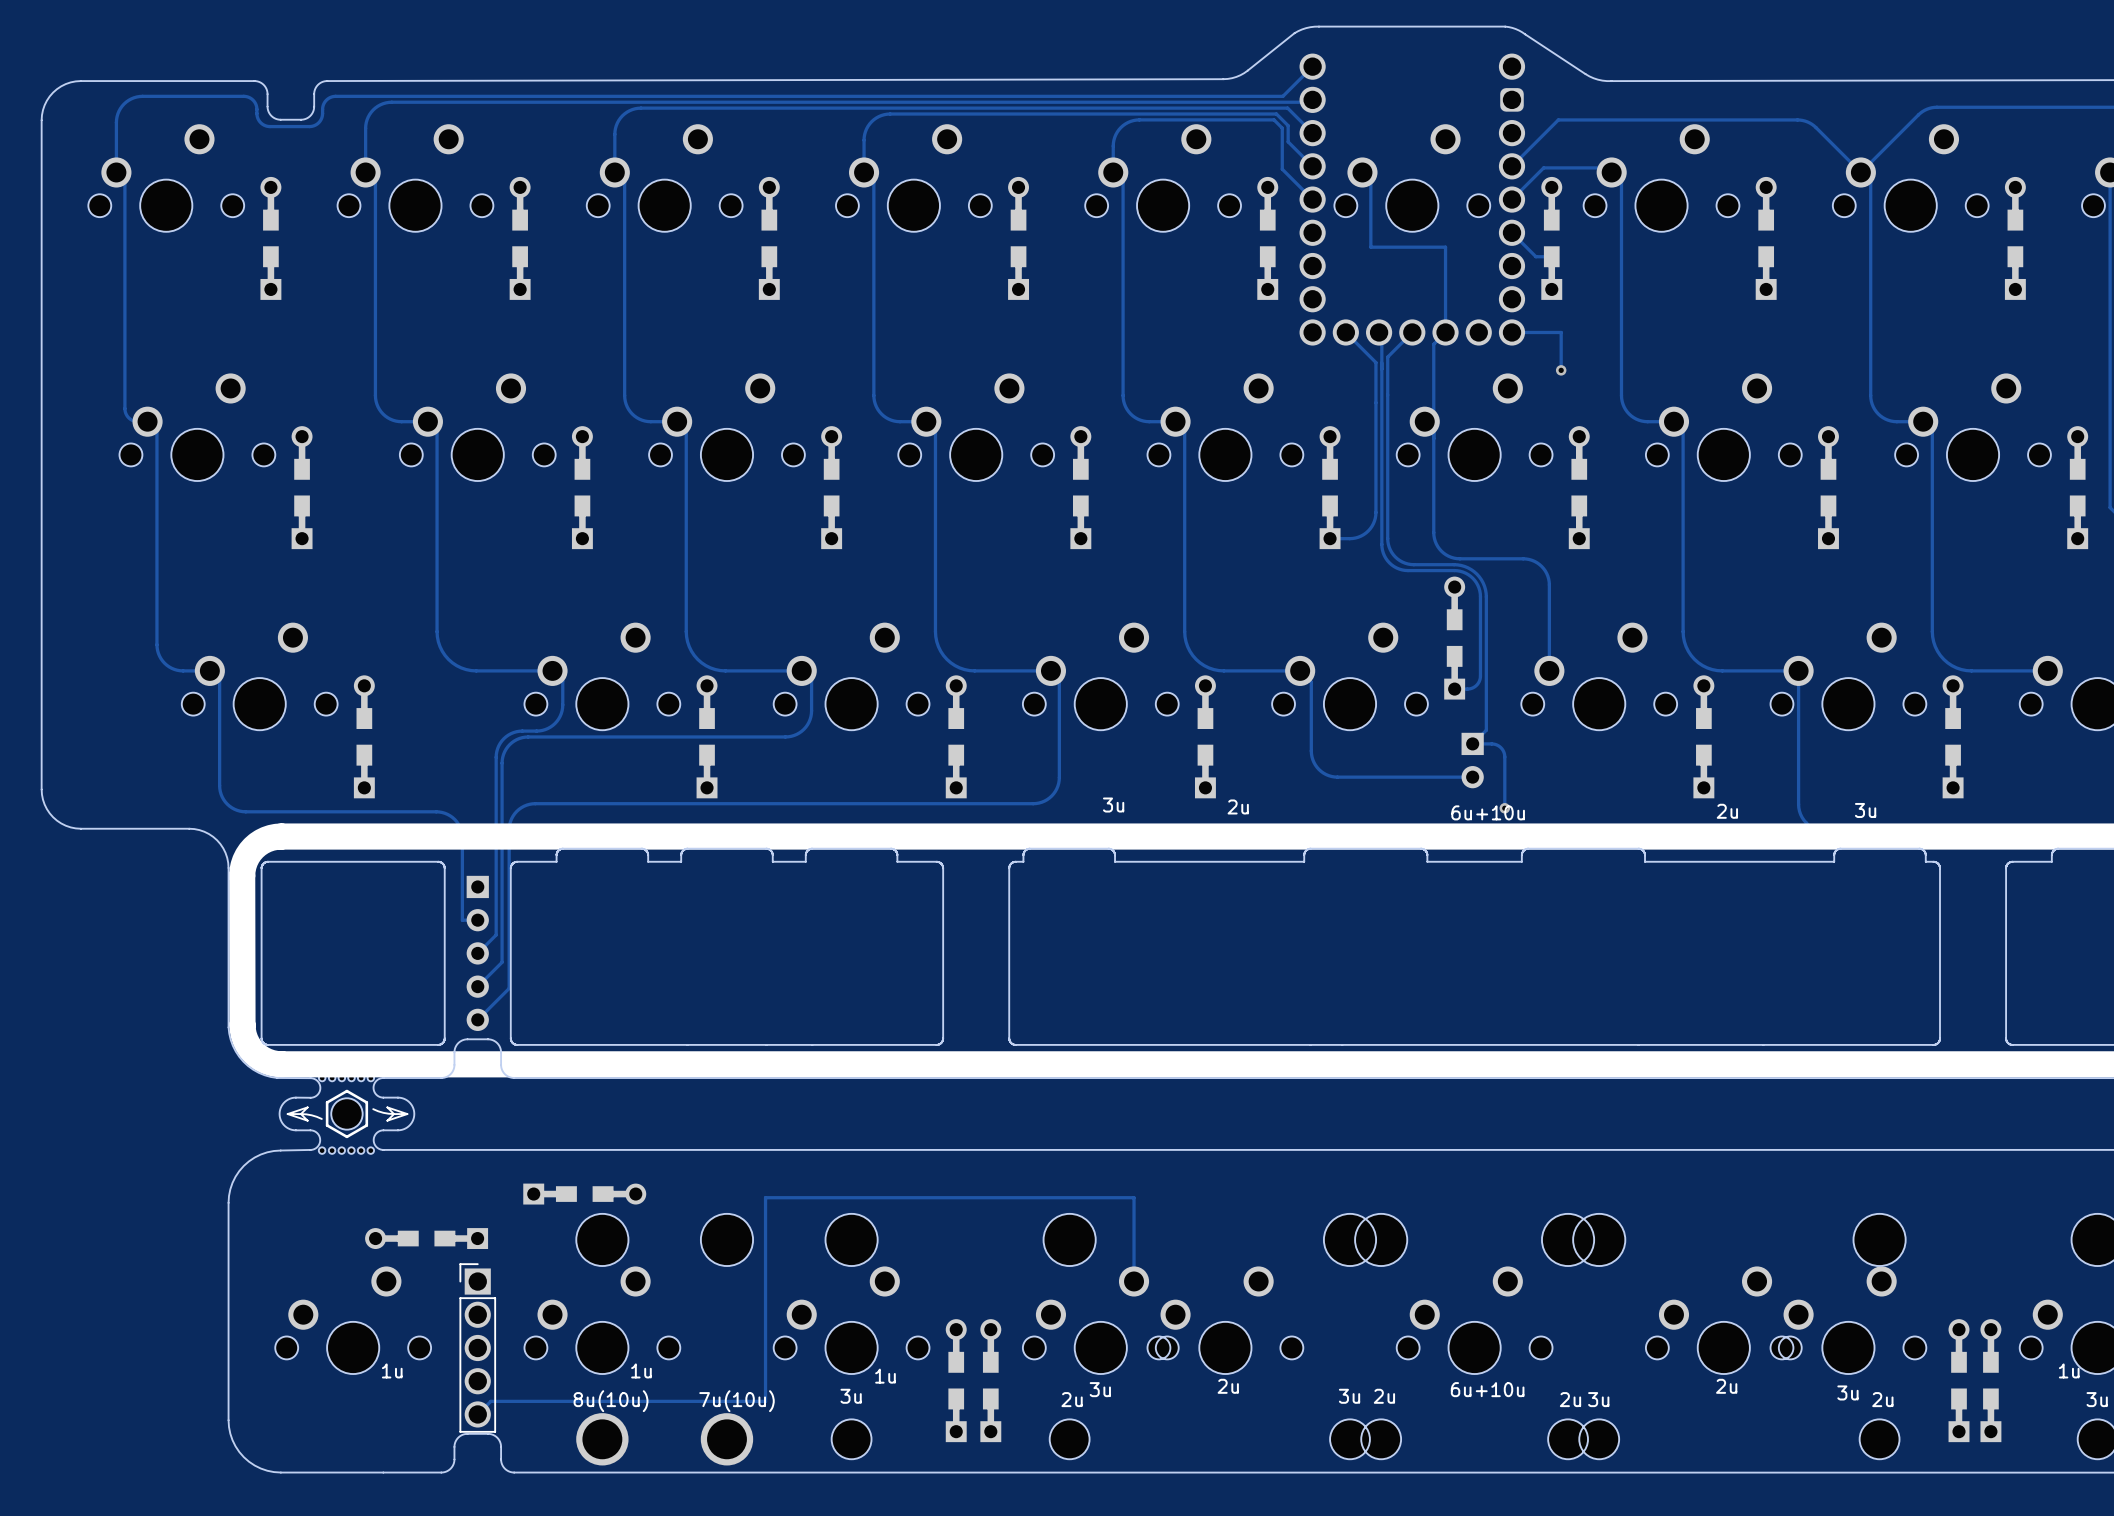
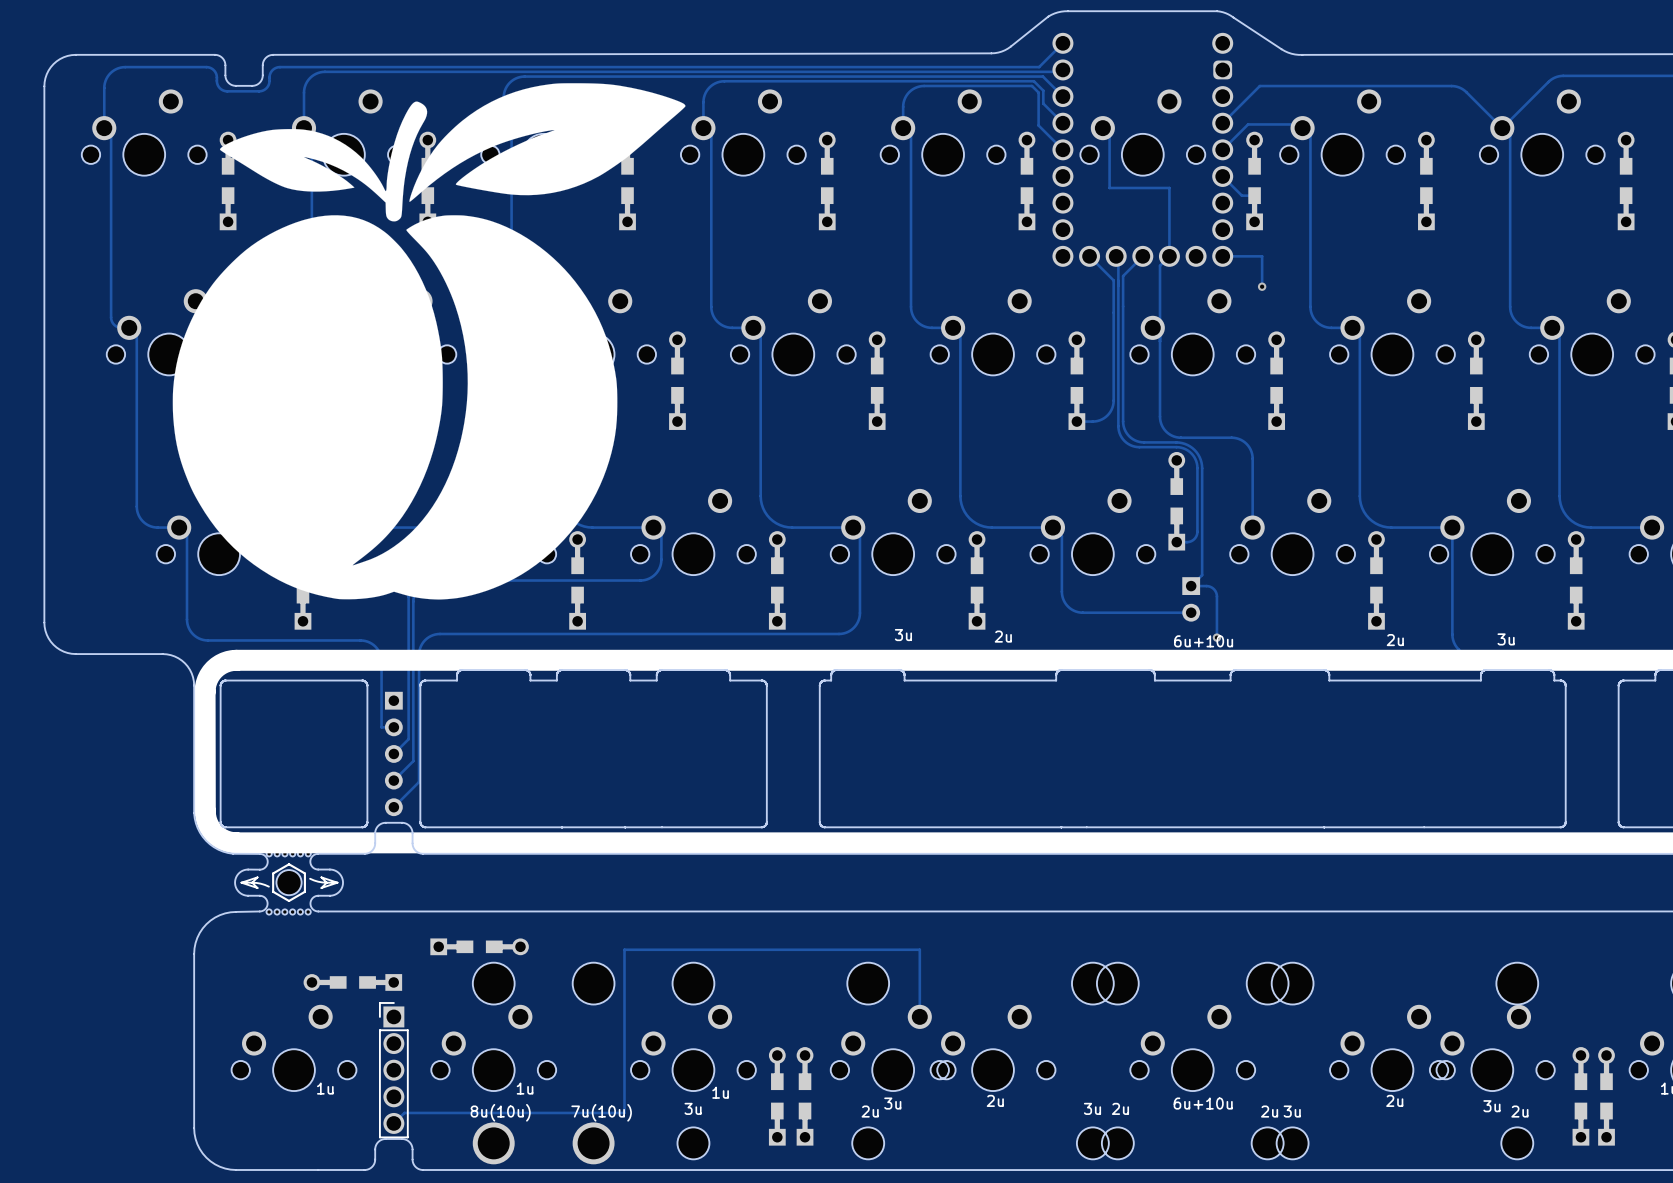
drawing: none -> [172, 83, 686, 600]

